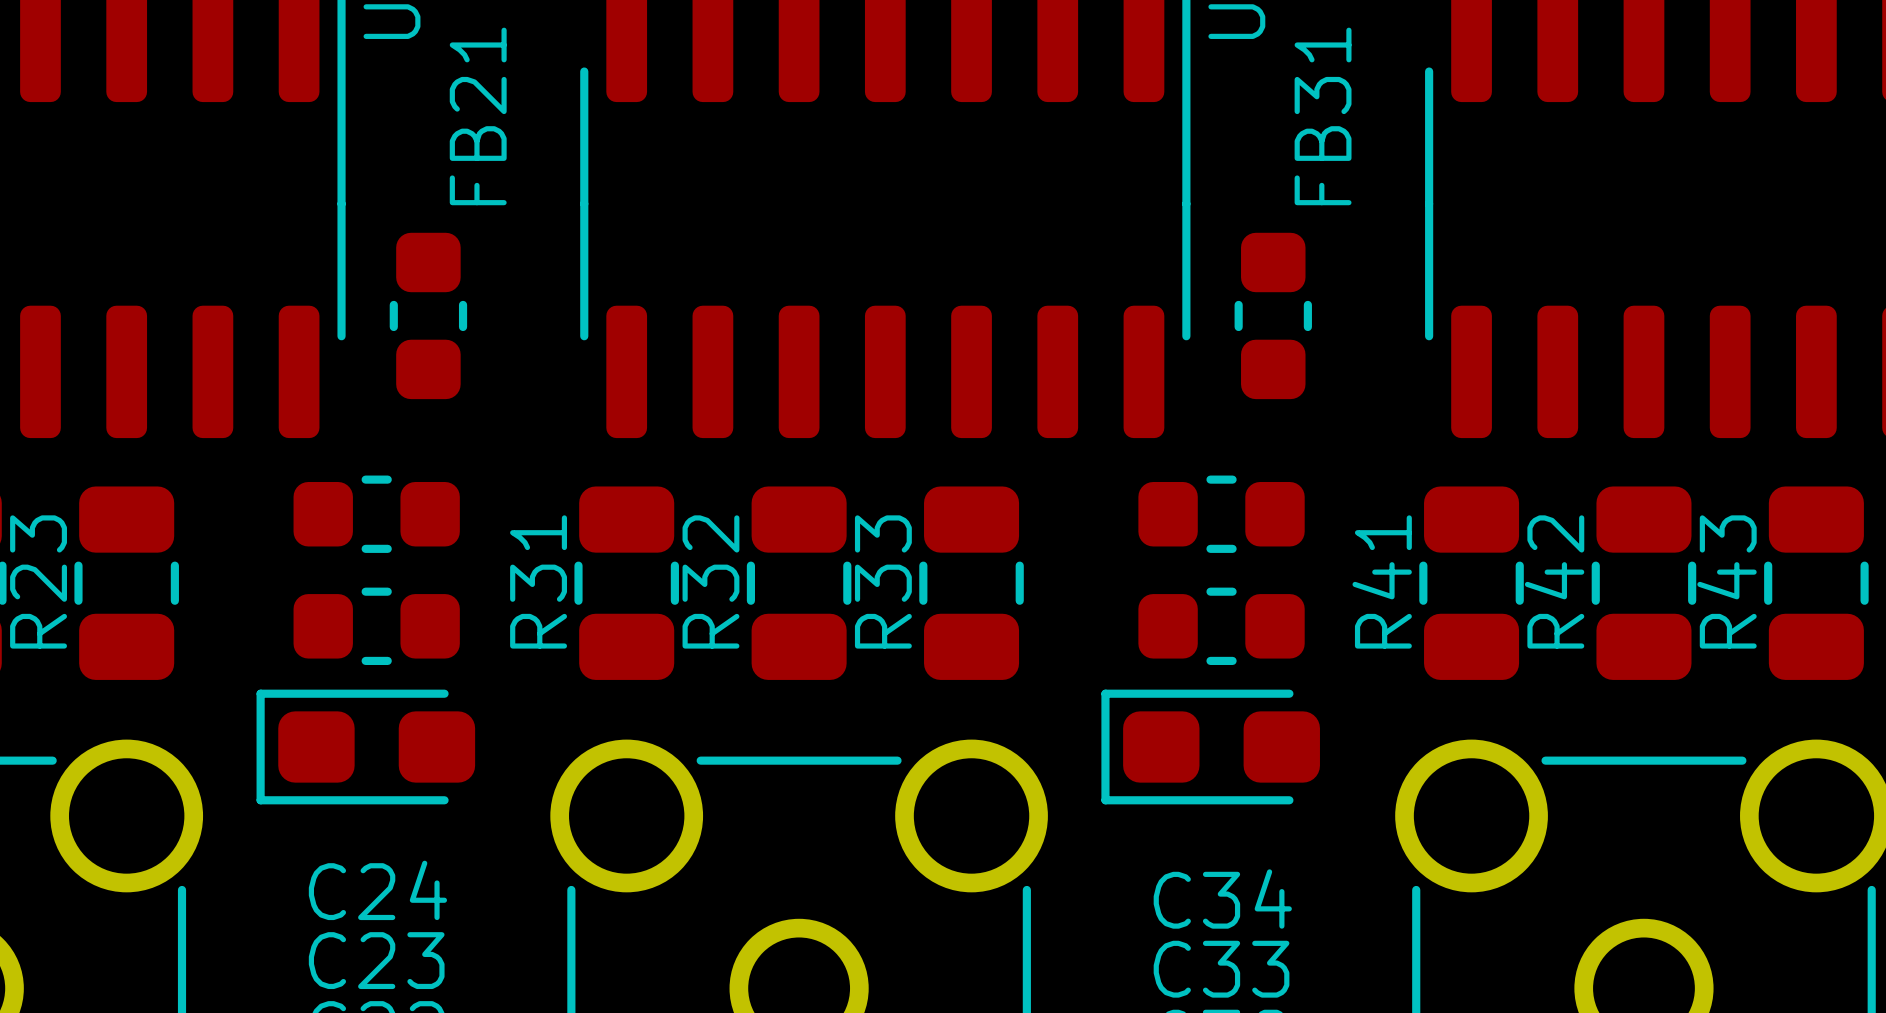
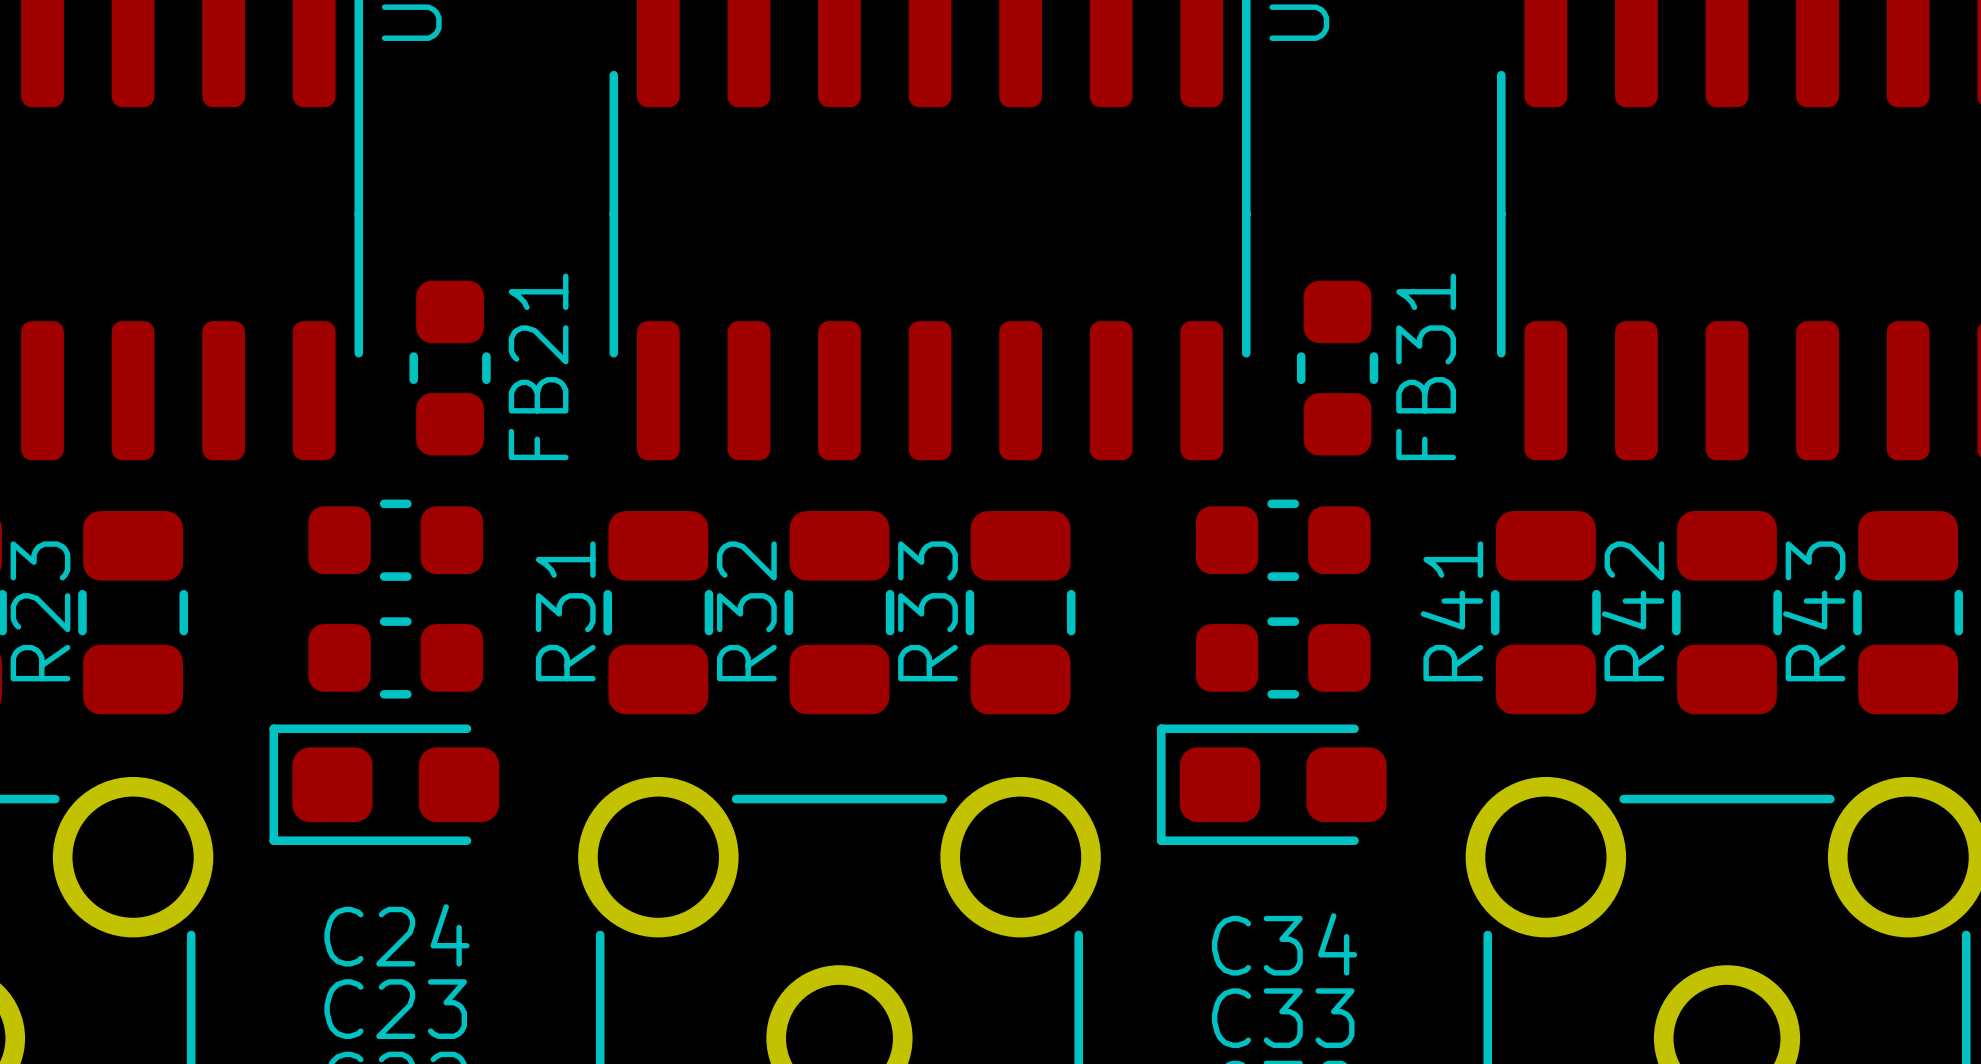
FB21 name position: FB21 (478, 116) -> FB21 (538, 366)
FB31 name position: FB31 (1323, 116) -> FB31 (1426, 366)
FB21 position: (428, 315) -> (450, 368)
FB31 position: (1273, 315) -> (1337, 368)

